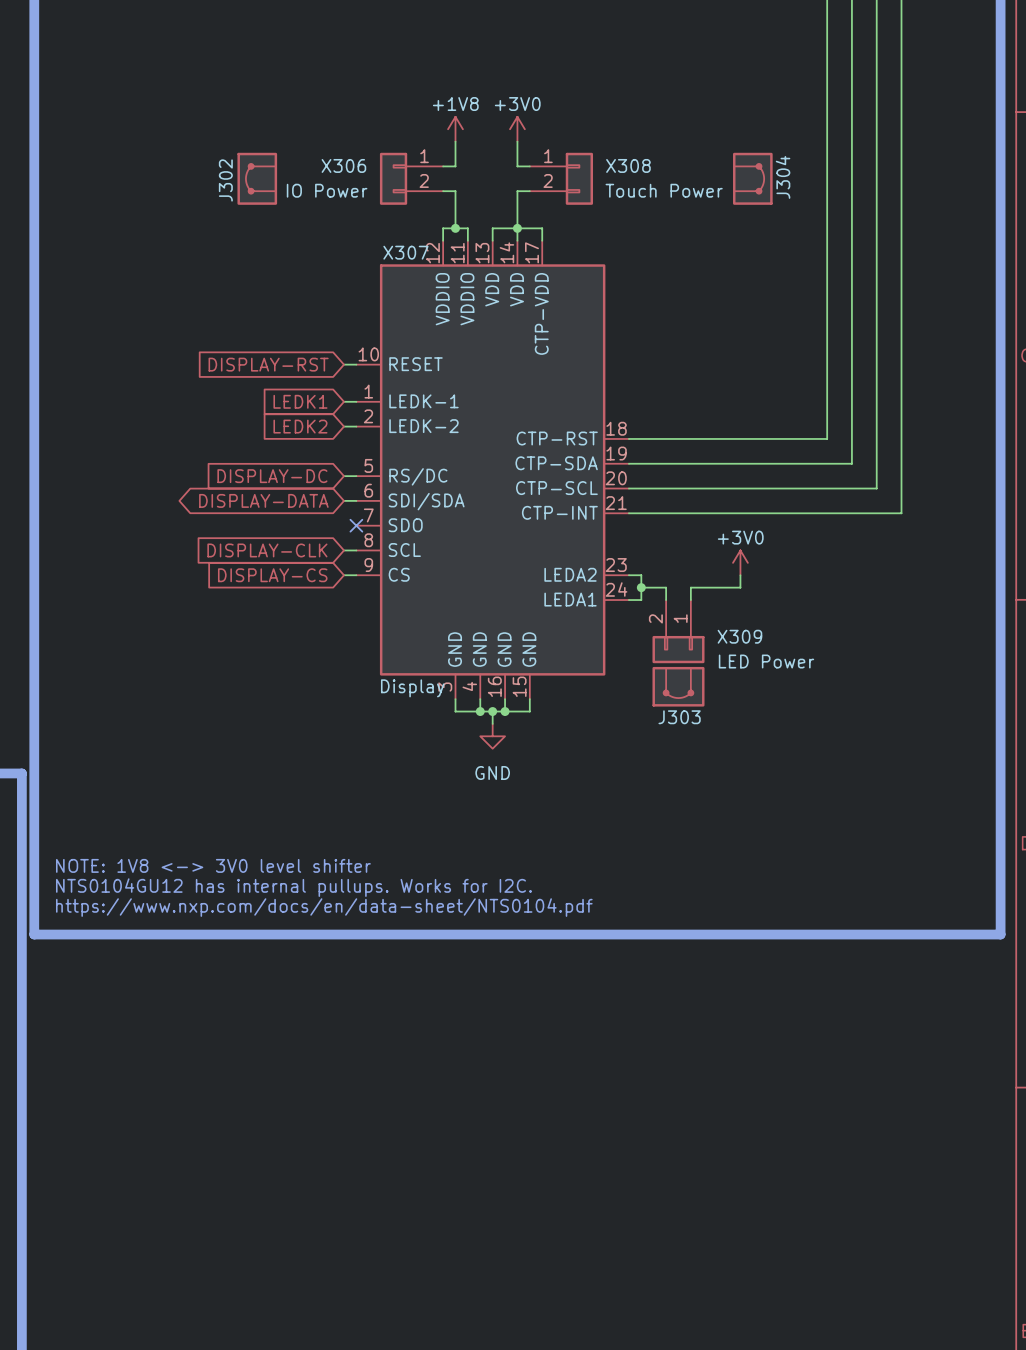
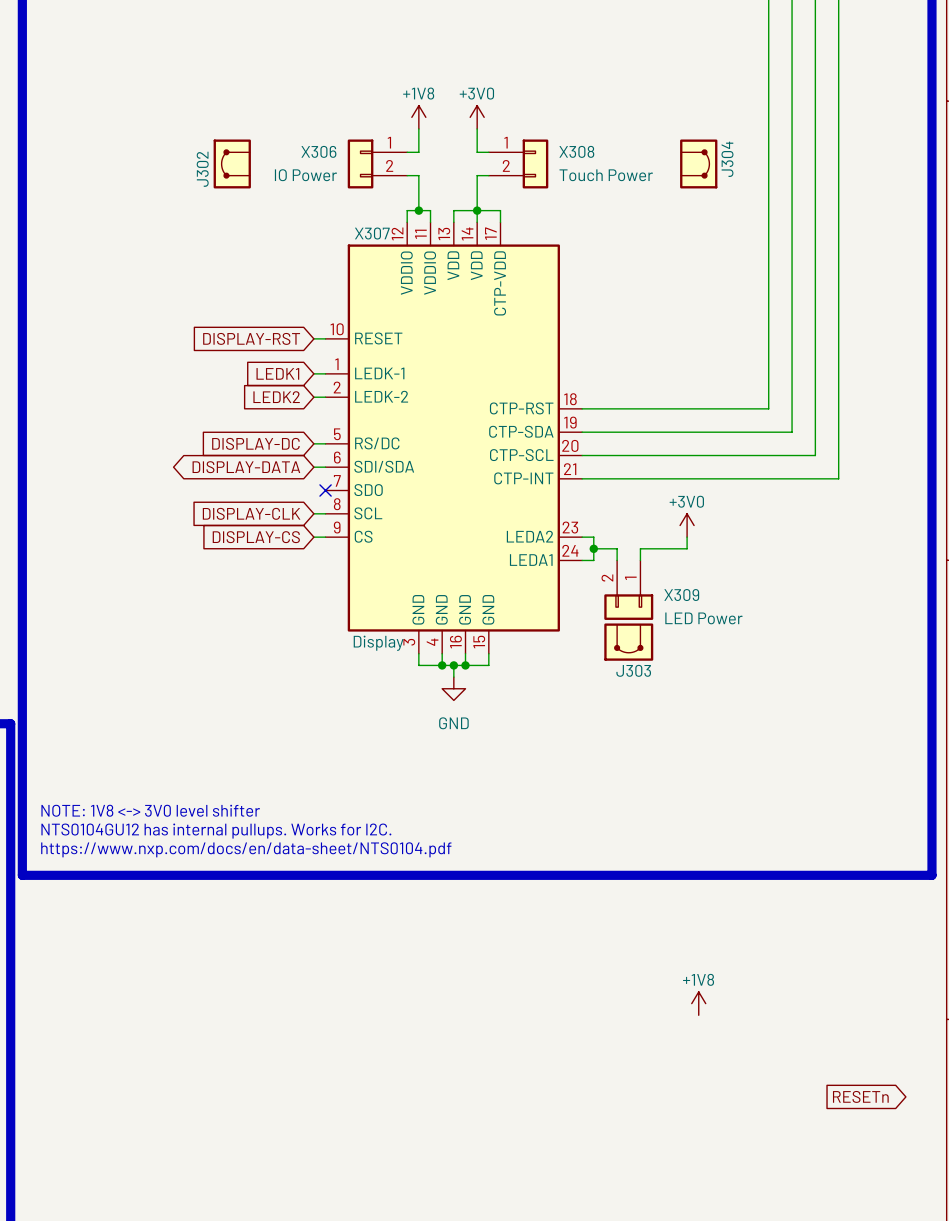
power symbol: none -> +1V8 (698, 1003)
global label: none -> RESETn (860, 1096)

